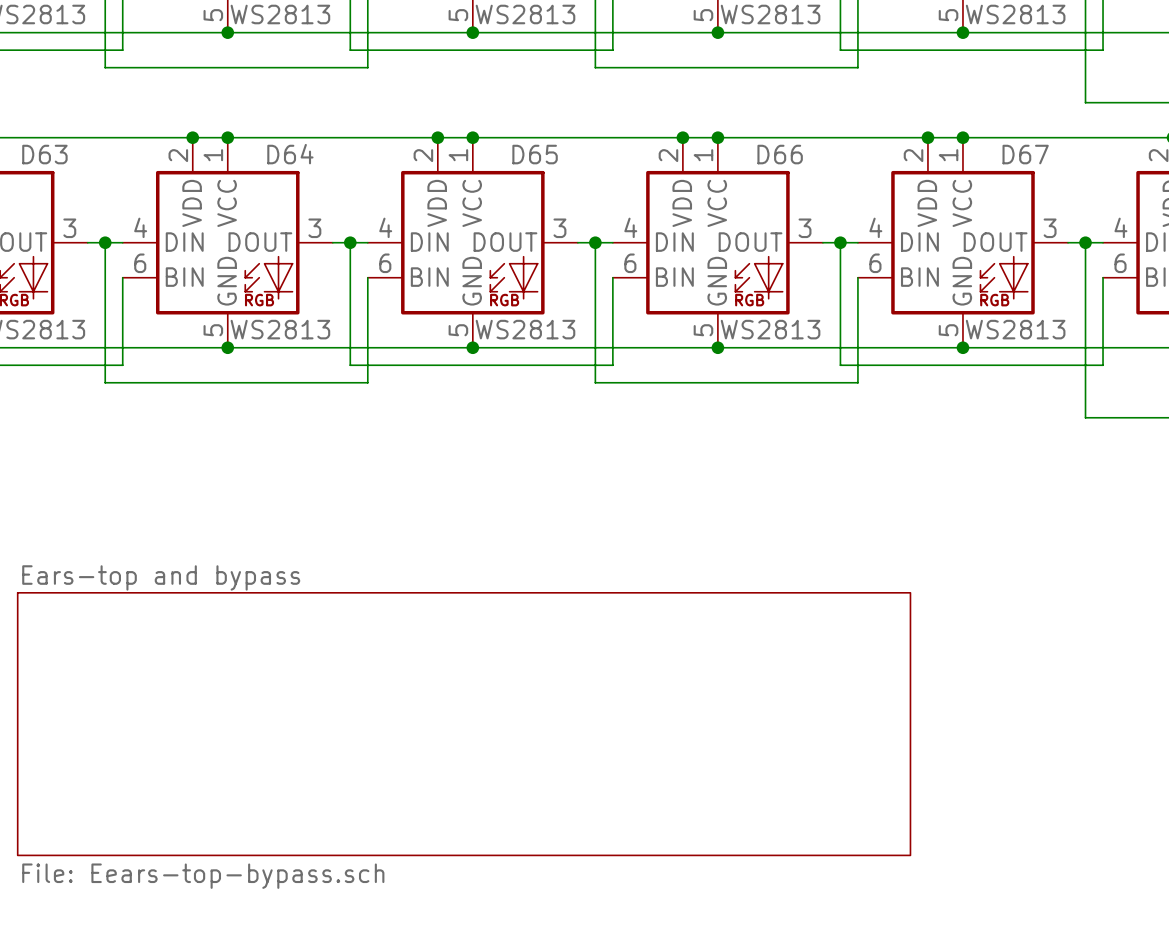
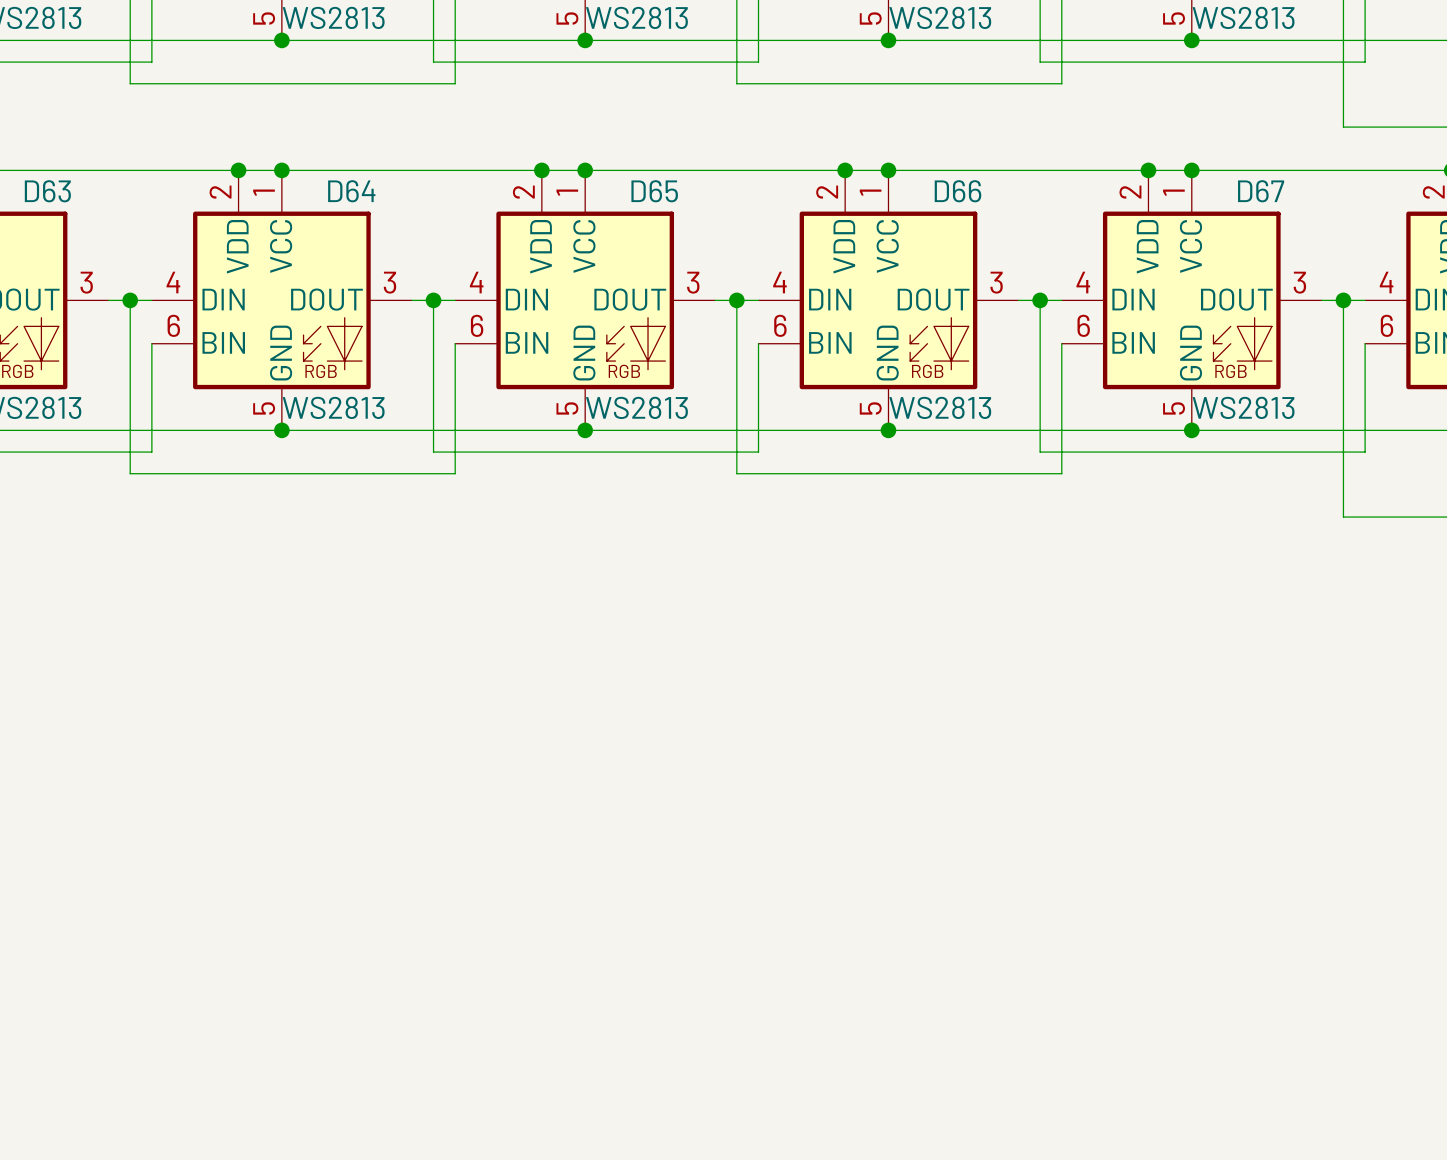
sheet Ears-top and bypass: File: Eears-top-bypass.sch (464, 724) -> none

